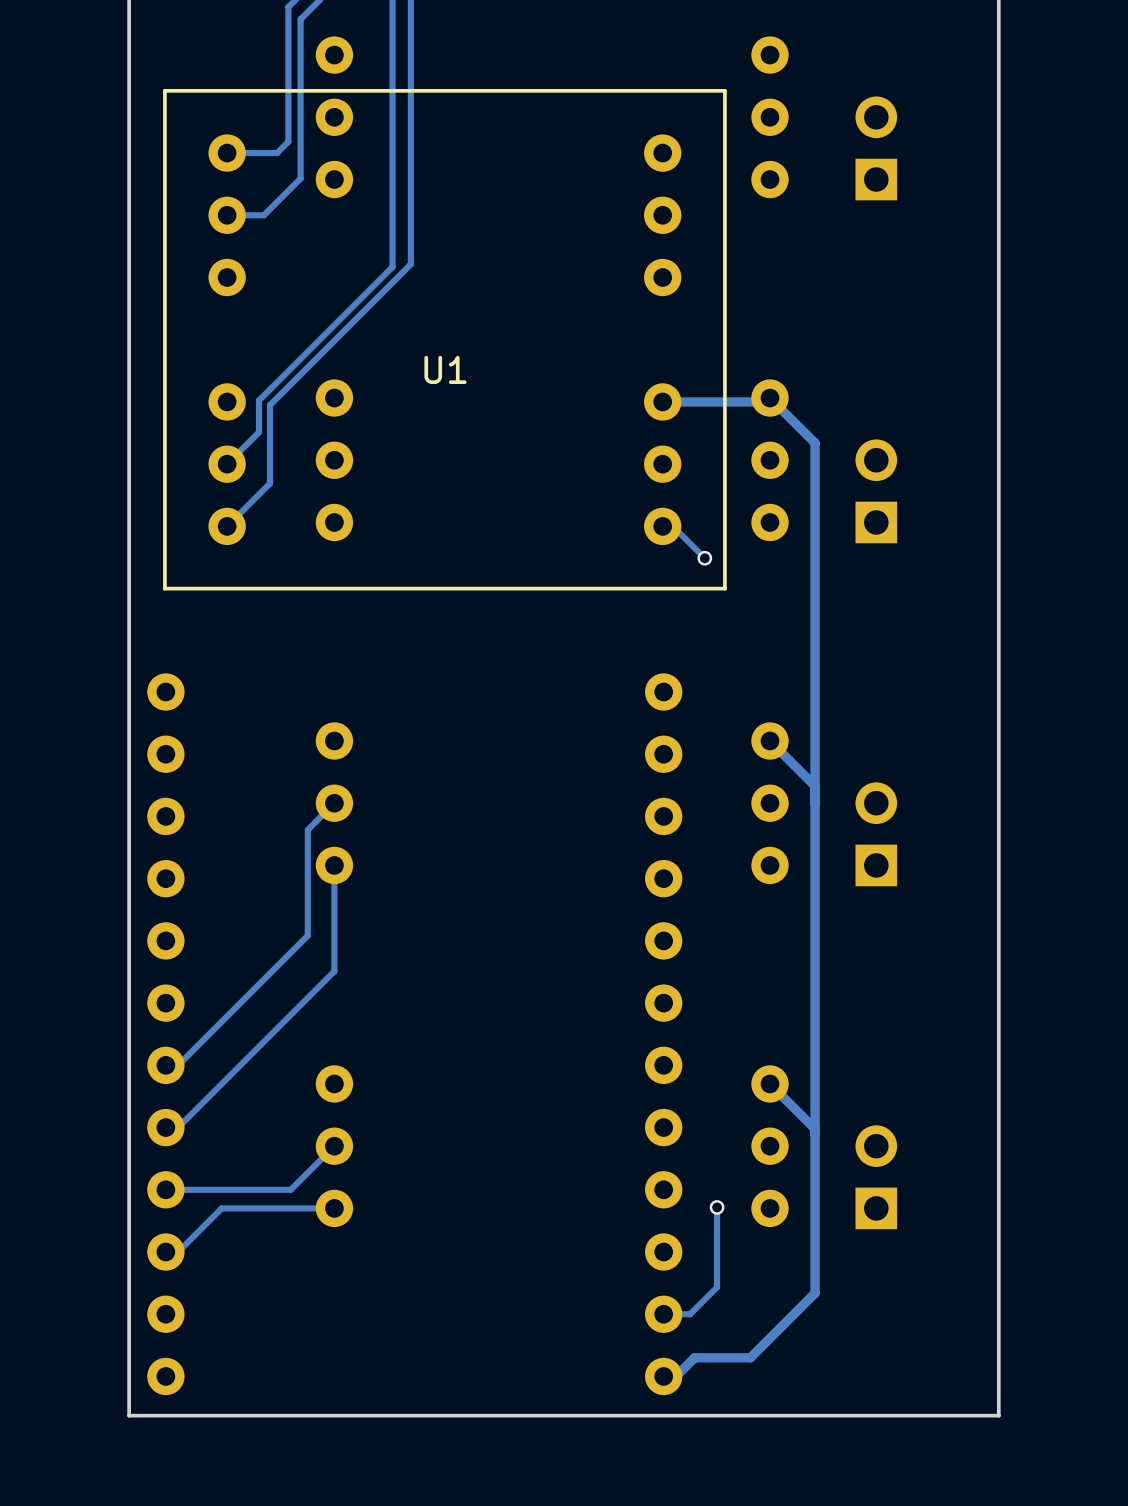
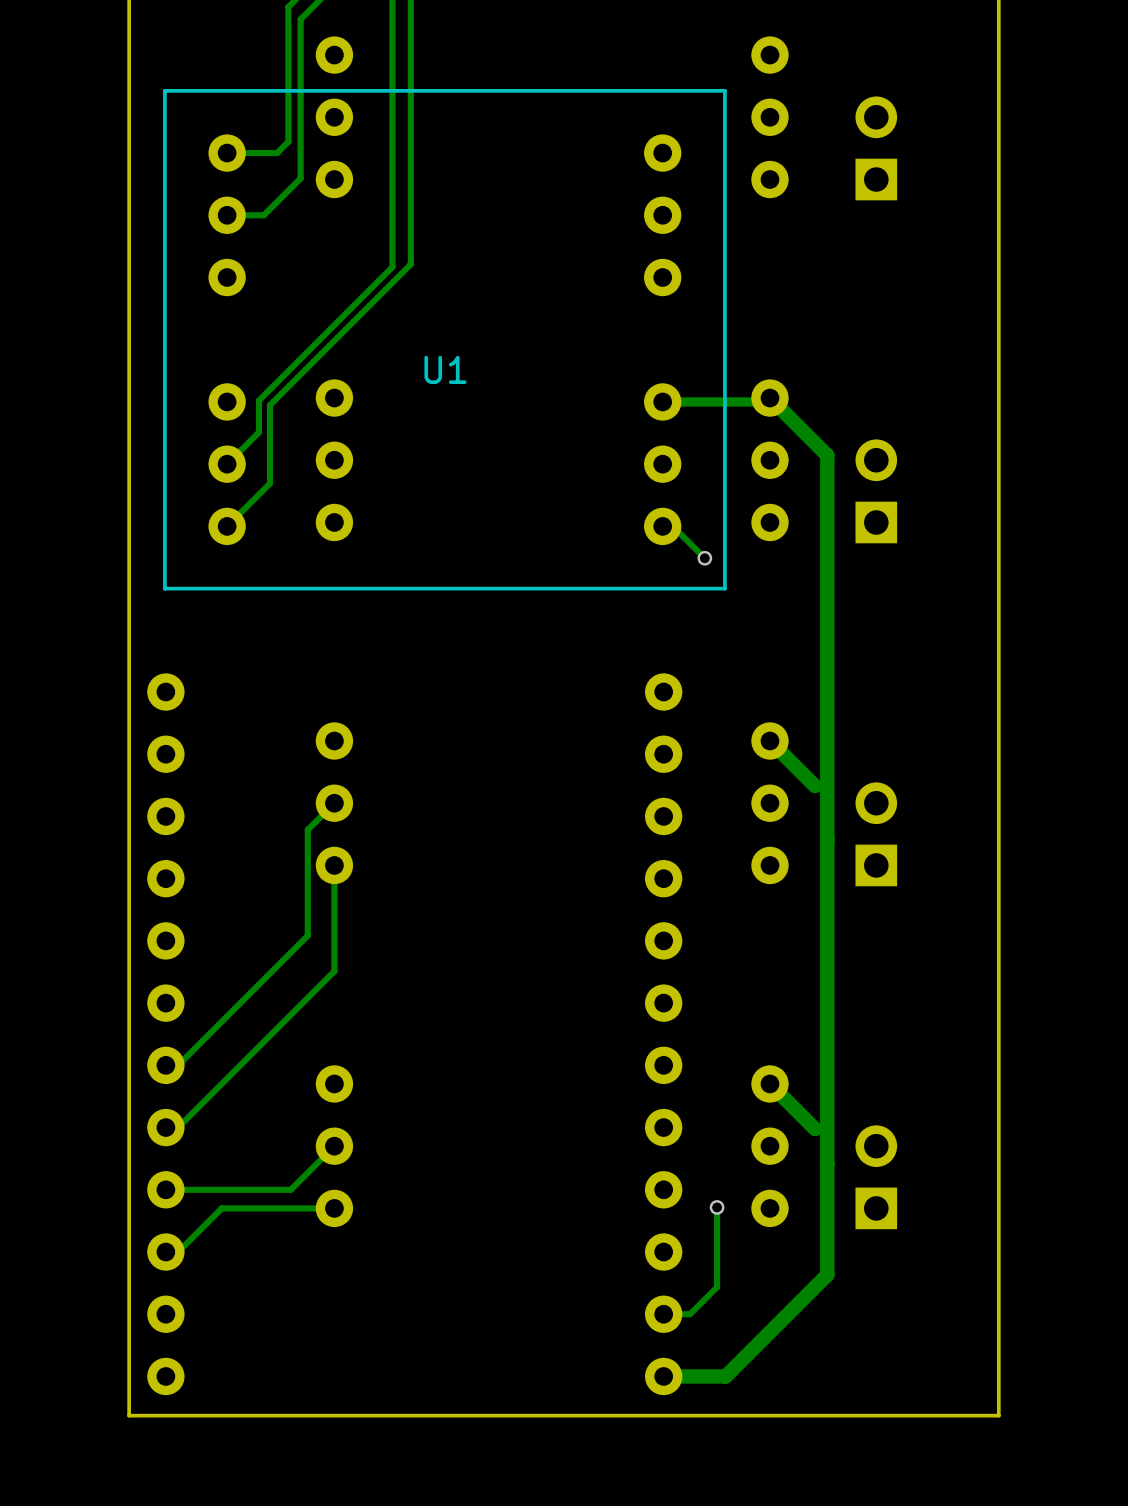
track width: thin (769, 398) (815, 443) -> thick (769, 398) (815, 443)
track: (815, 443) (815, 1293) (750, 1357) (694, 1357) (675, 1376) -> (815, 443) (827, 455) (827, 1274) (725, 1376) (663, 1376)
track width: thin (769, 740) (815, 786) -> thick (769, 740) (815, 786)
track width: thin (769, 1083) (815, 1129) -> thick (769, 1083) (815, 1129)

